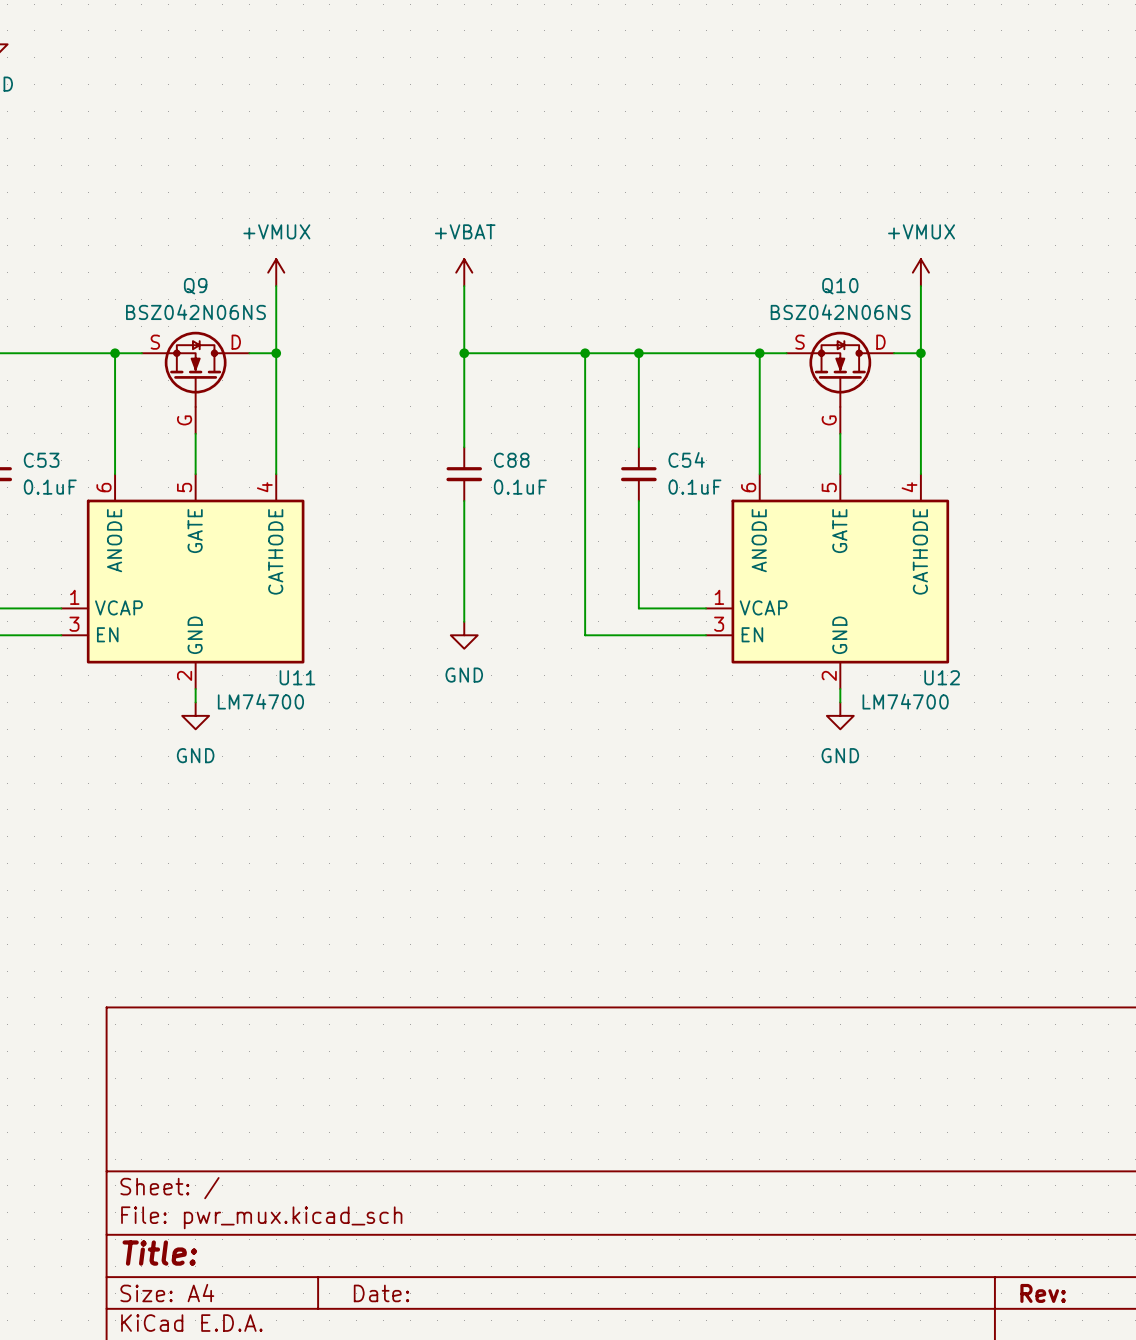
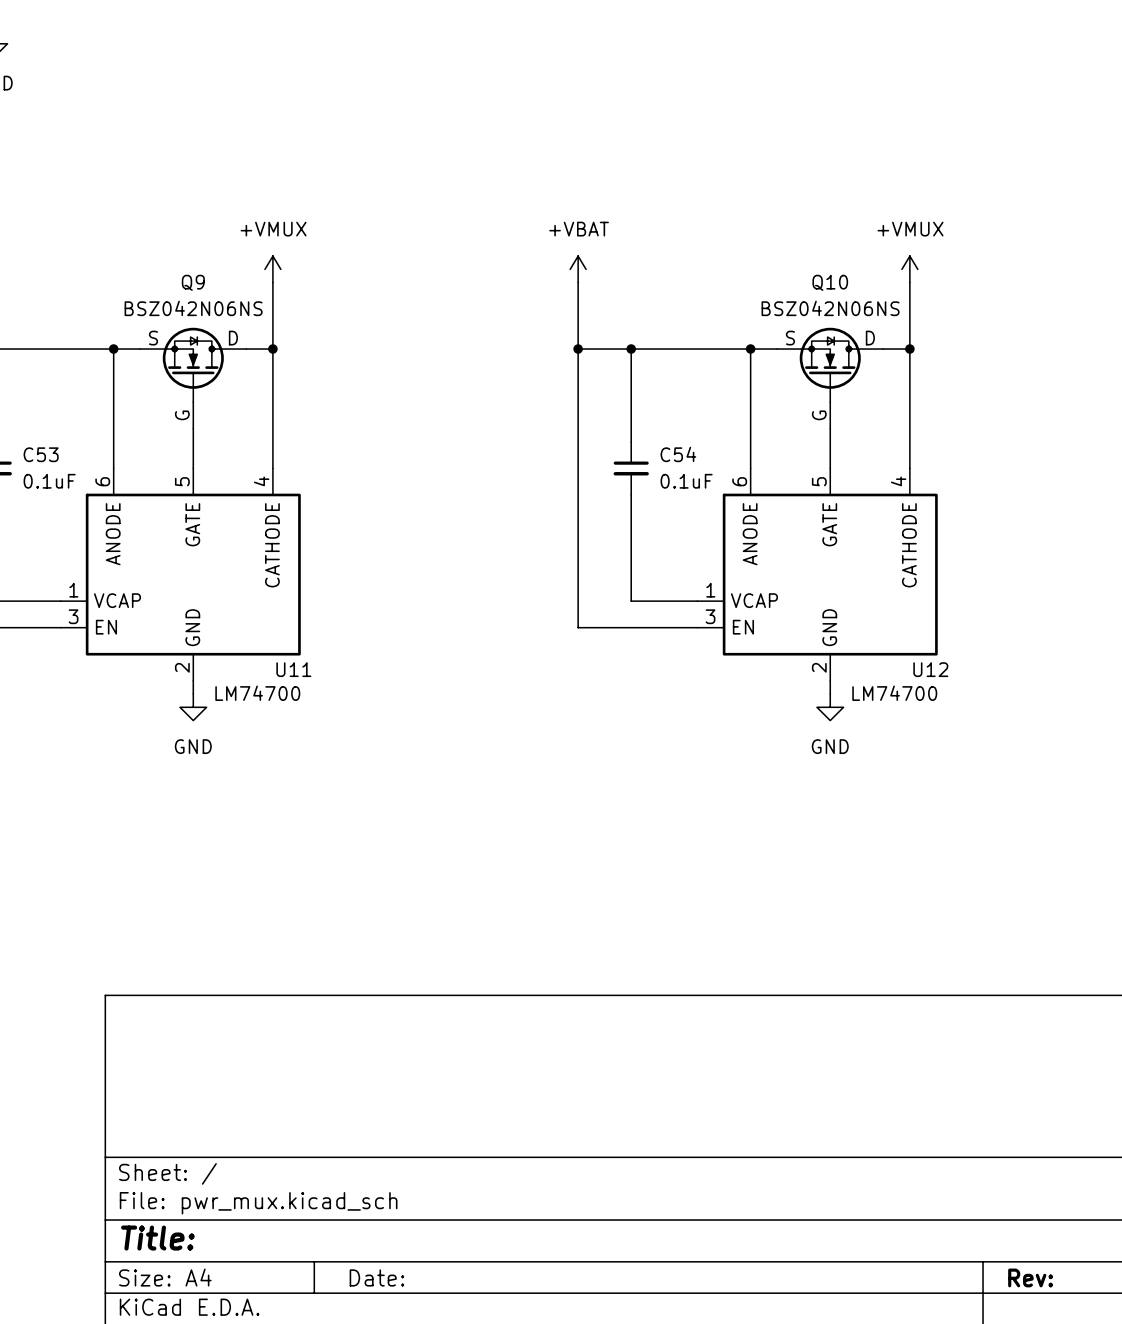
power symbol position: +VBAT (464, 272) -> +VBAT (578, 269)
wire: (464, 286) (464, 447) -> none
wire: (464, 353) (585, 353) -> (578, 282) (578, 349)
junction: (464, 353) -> none
C88: 0.1uF (464, 474) -> none
wire: (464, 500) (464, 621) -> none
power symbol: GND (464, 635) -> none

